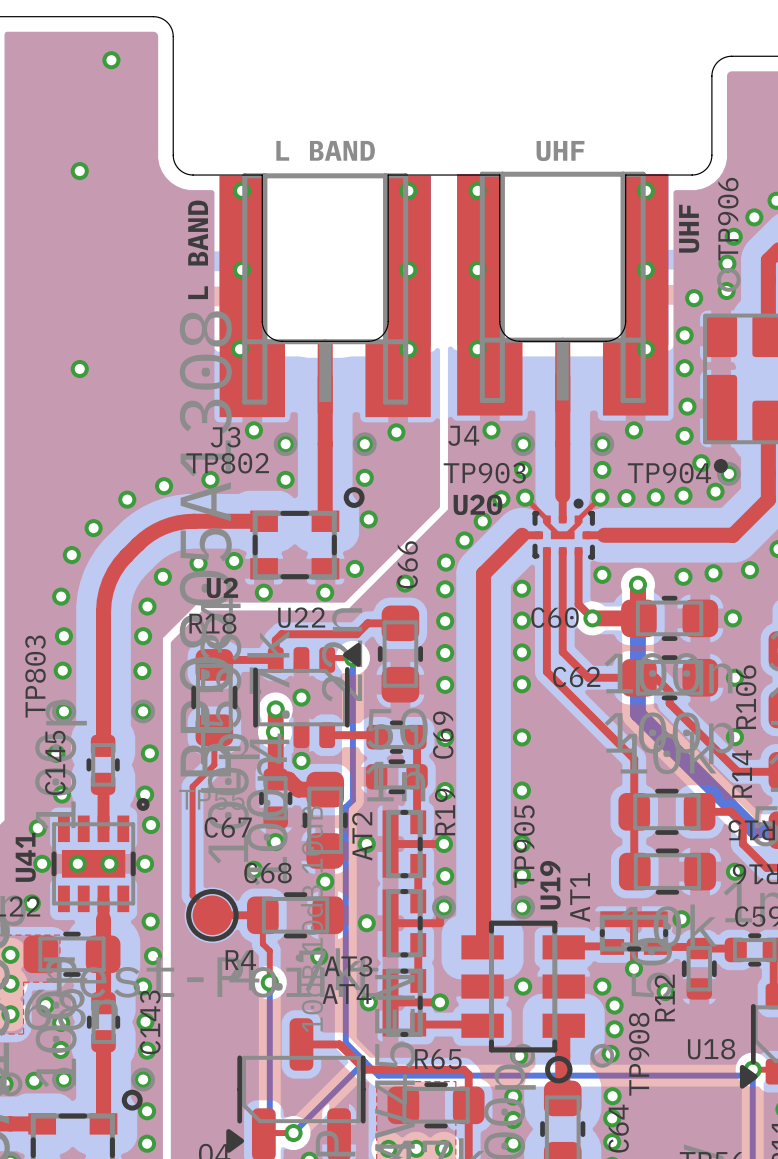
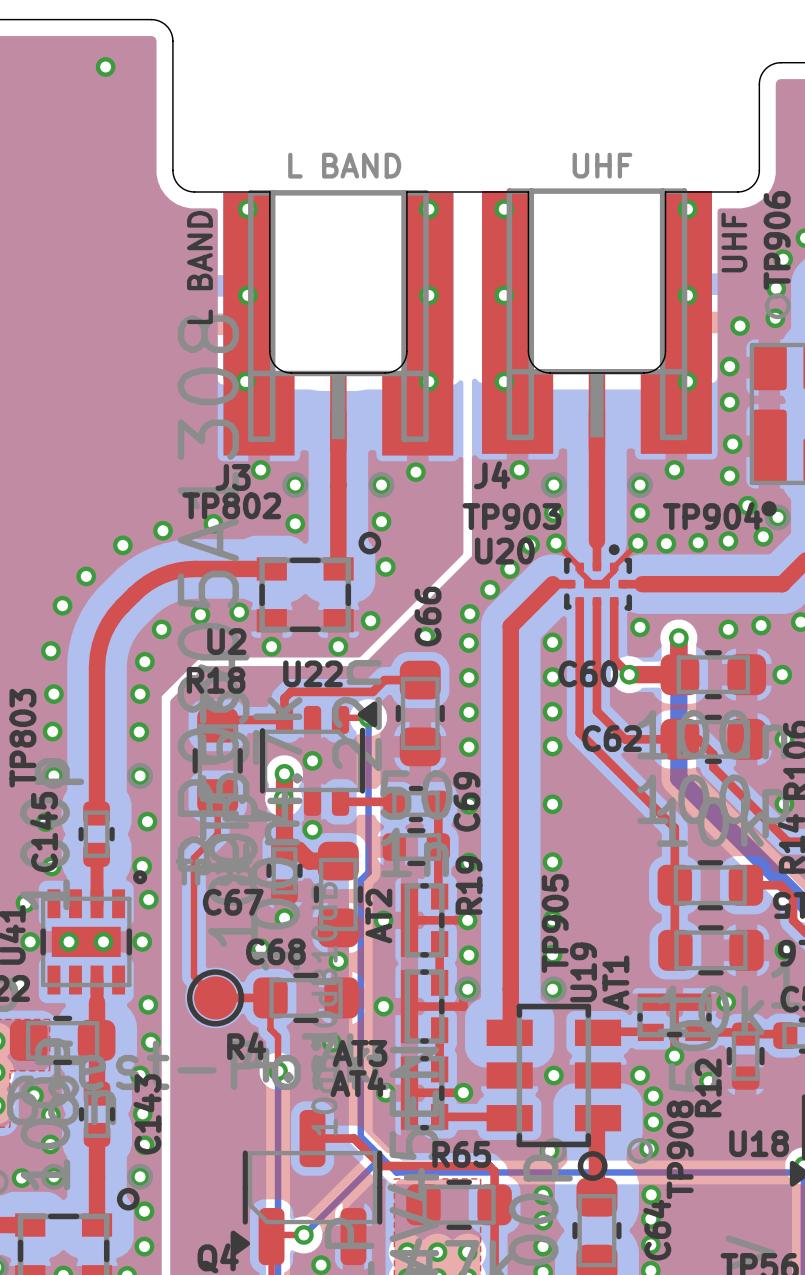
via: (79, 171) -> none
via: (79, 369) -> none

